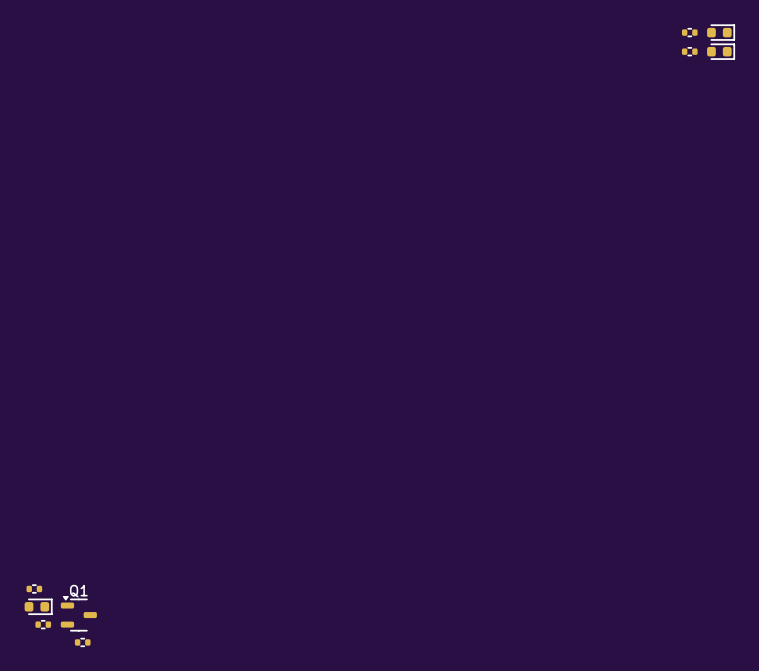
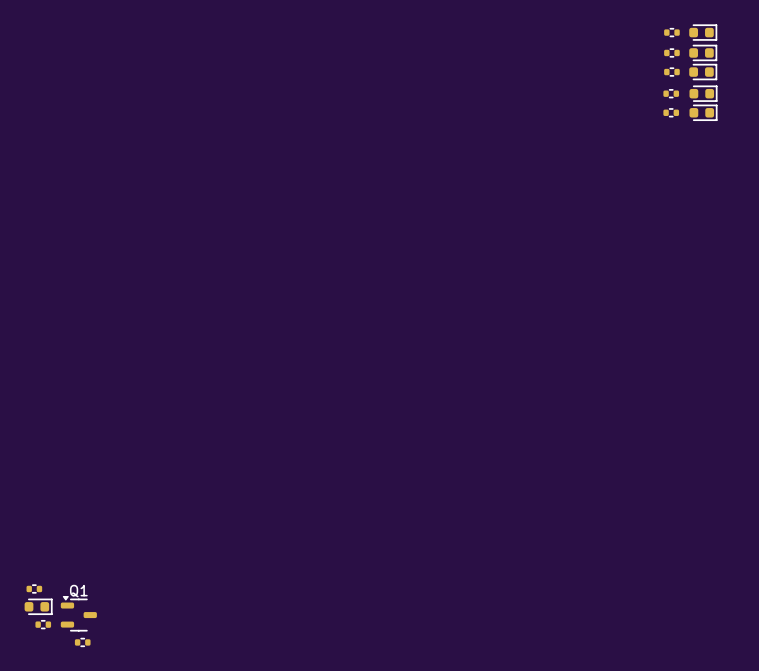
part: none -> (671, 32)
part: (689, 32) -> none
part: none -> (703, 32)
part: (720, 32) -> none
part: (689, 51) -> none
part: (720, 51) -> none
part: none -> (671, 52)
part: none -> (703, 52)
part: none -> (671, 72)
part: none -> (703, 72)
part: none -> (671, 93)
part: none -> (703, 93)
part: none -> (671, 112)
part: none -> (703, 112)

